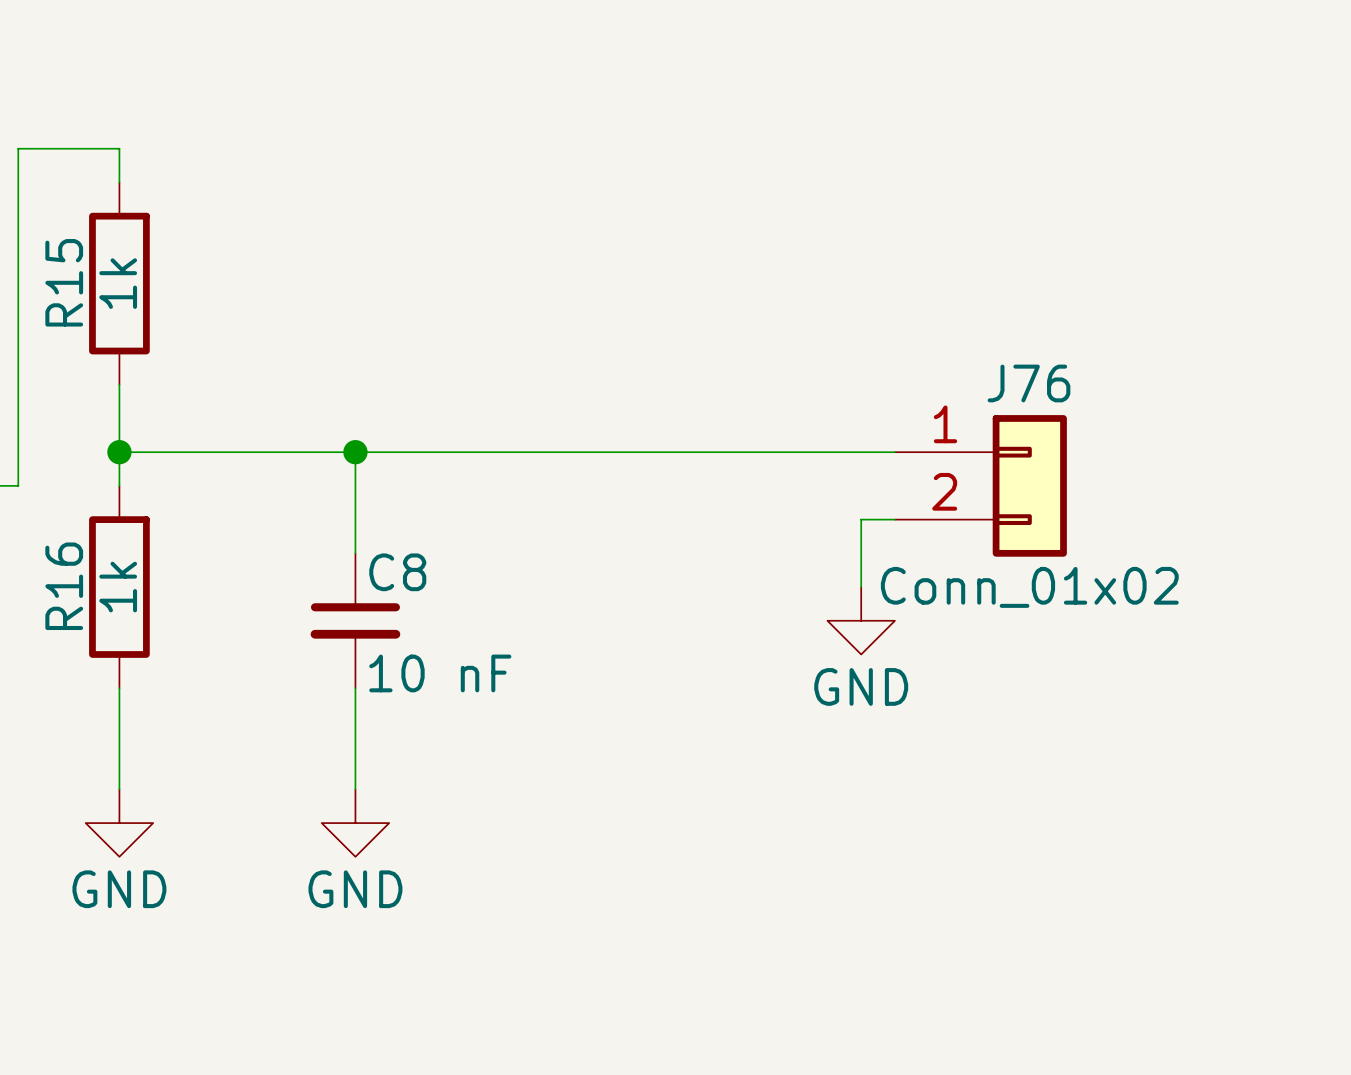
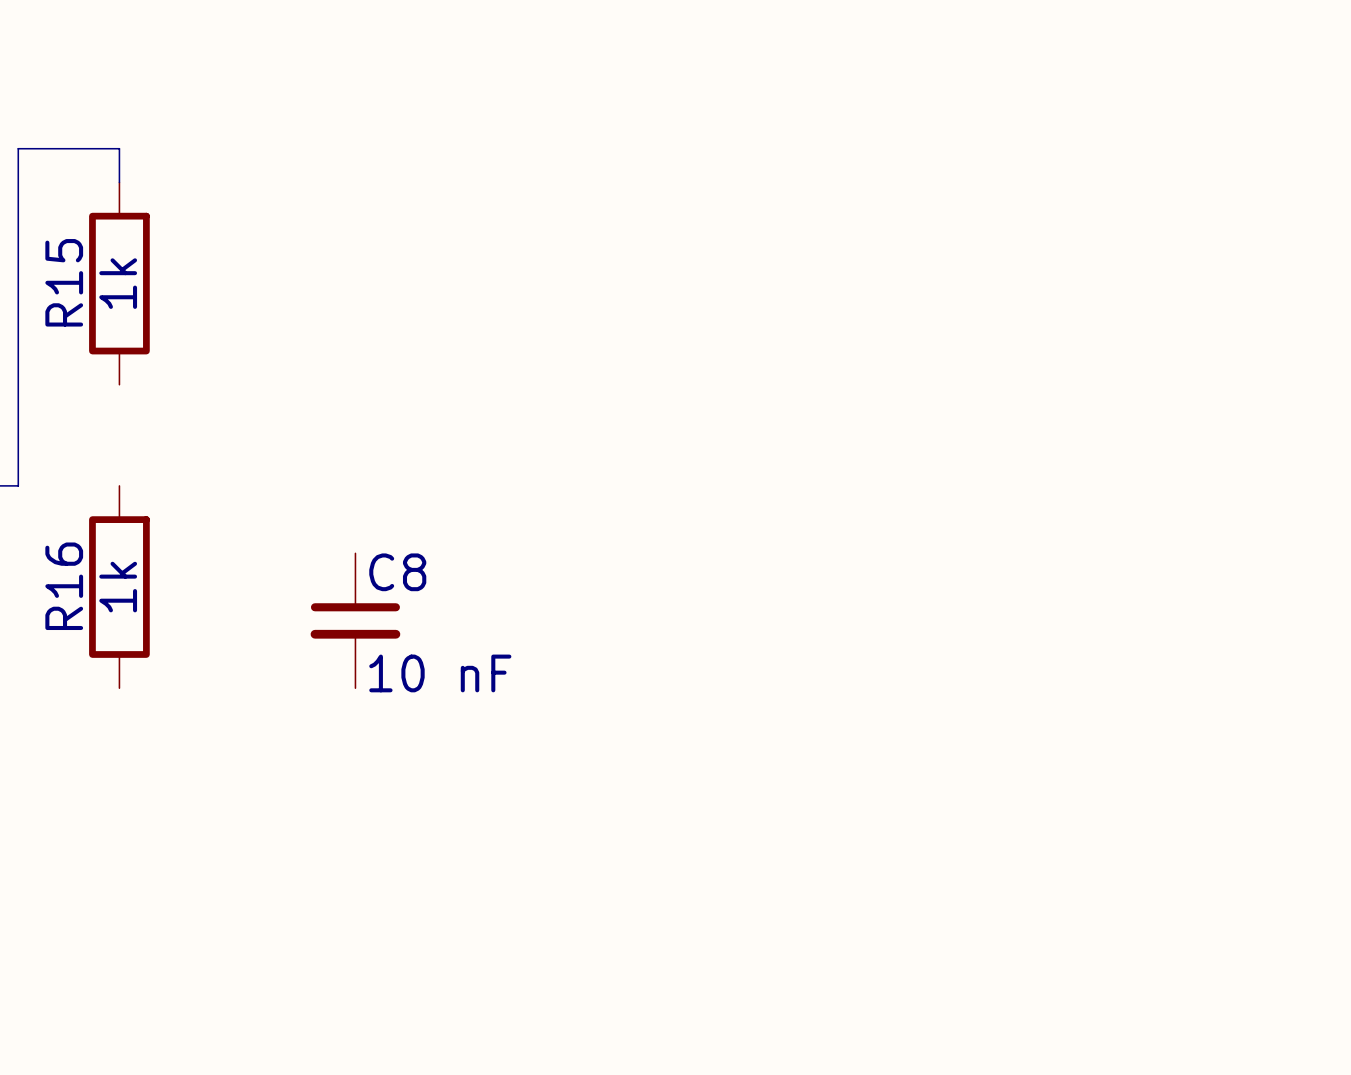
wire: (119, 384) (119, 485) -> none
wire: (119, 452) (894, 452) -> none
junction: (119, 452) -> none
wire: (355, 452) (355, 553) -> none
junction: (355, 452) -> none
J76: Conn_01x02 (980, 485) -> none
wire: (894, 519) (861, 519) (861, 587) -> none
power symbol: GND (861, 620) -> none
wire: (119, 688) (119, 789) -> none
wire: (355, 688) (355, 789) -> none
power symbol: GND (119, 823) -> none
power symbol: GND (355, 823) -> none

